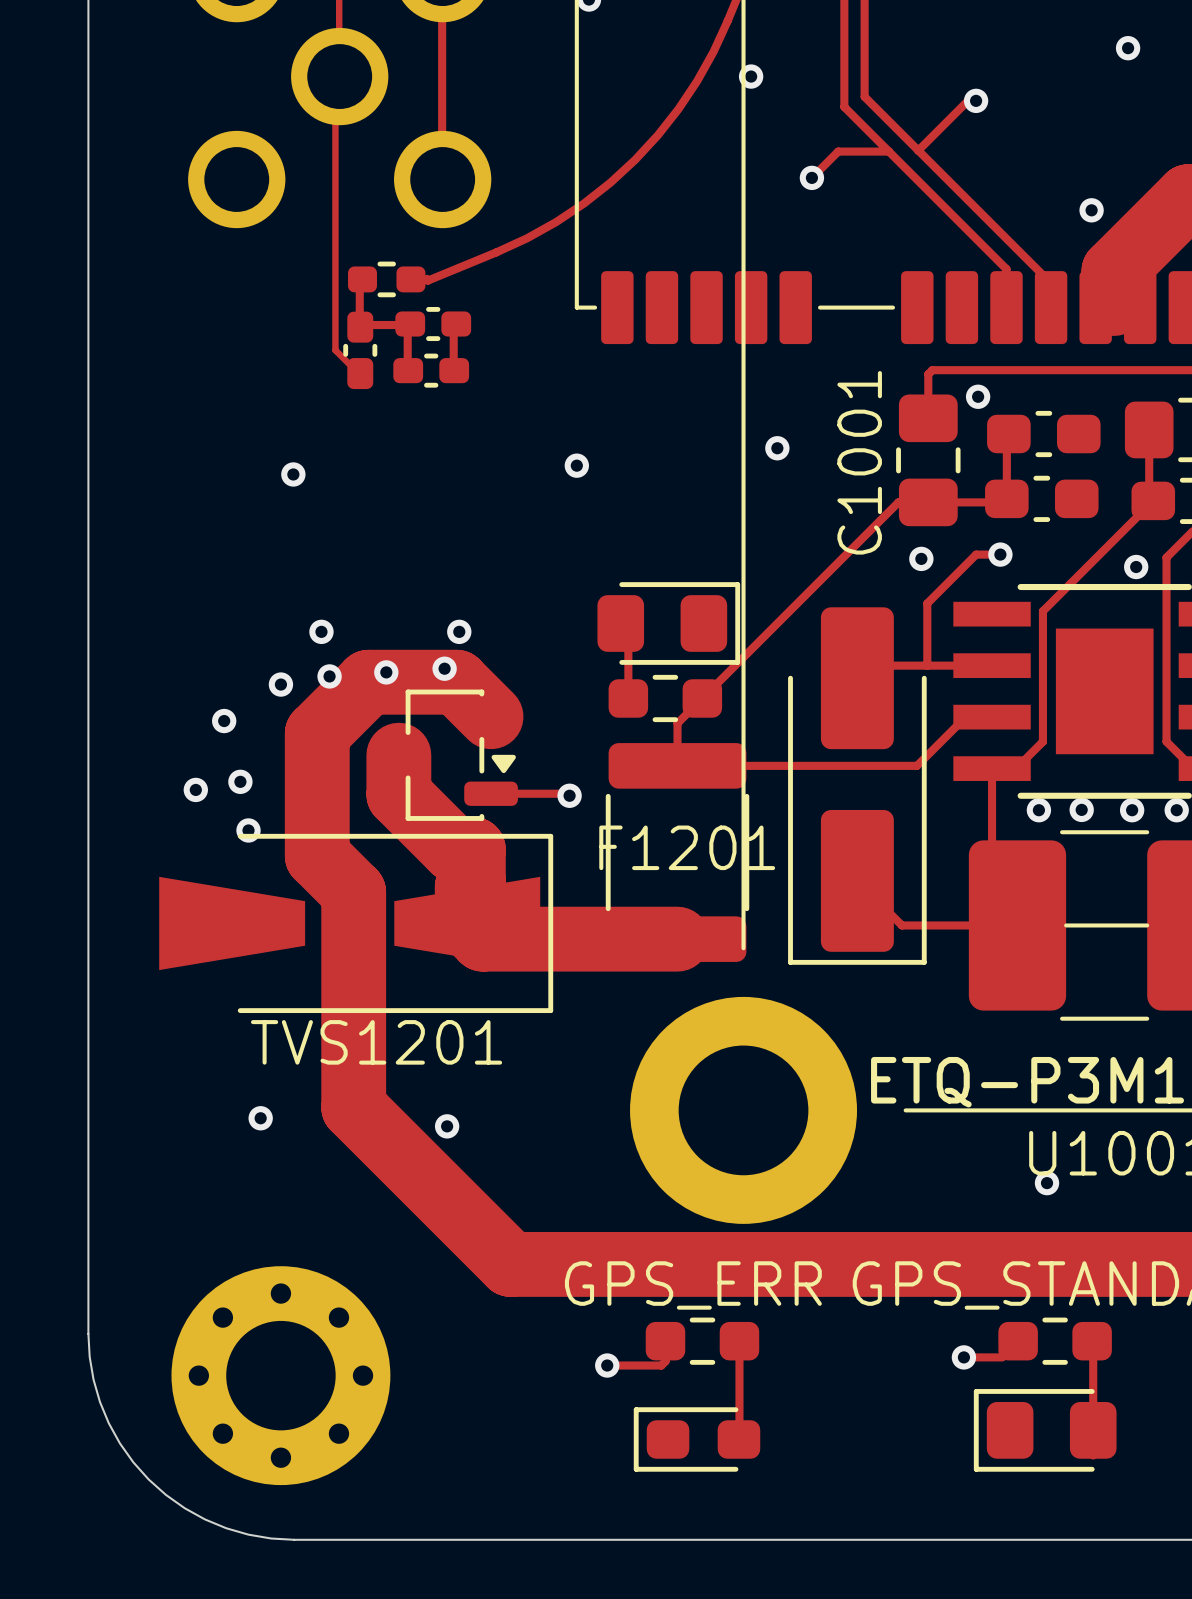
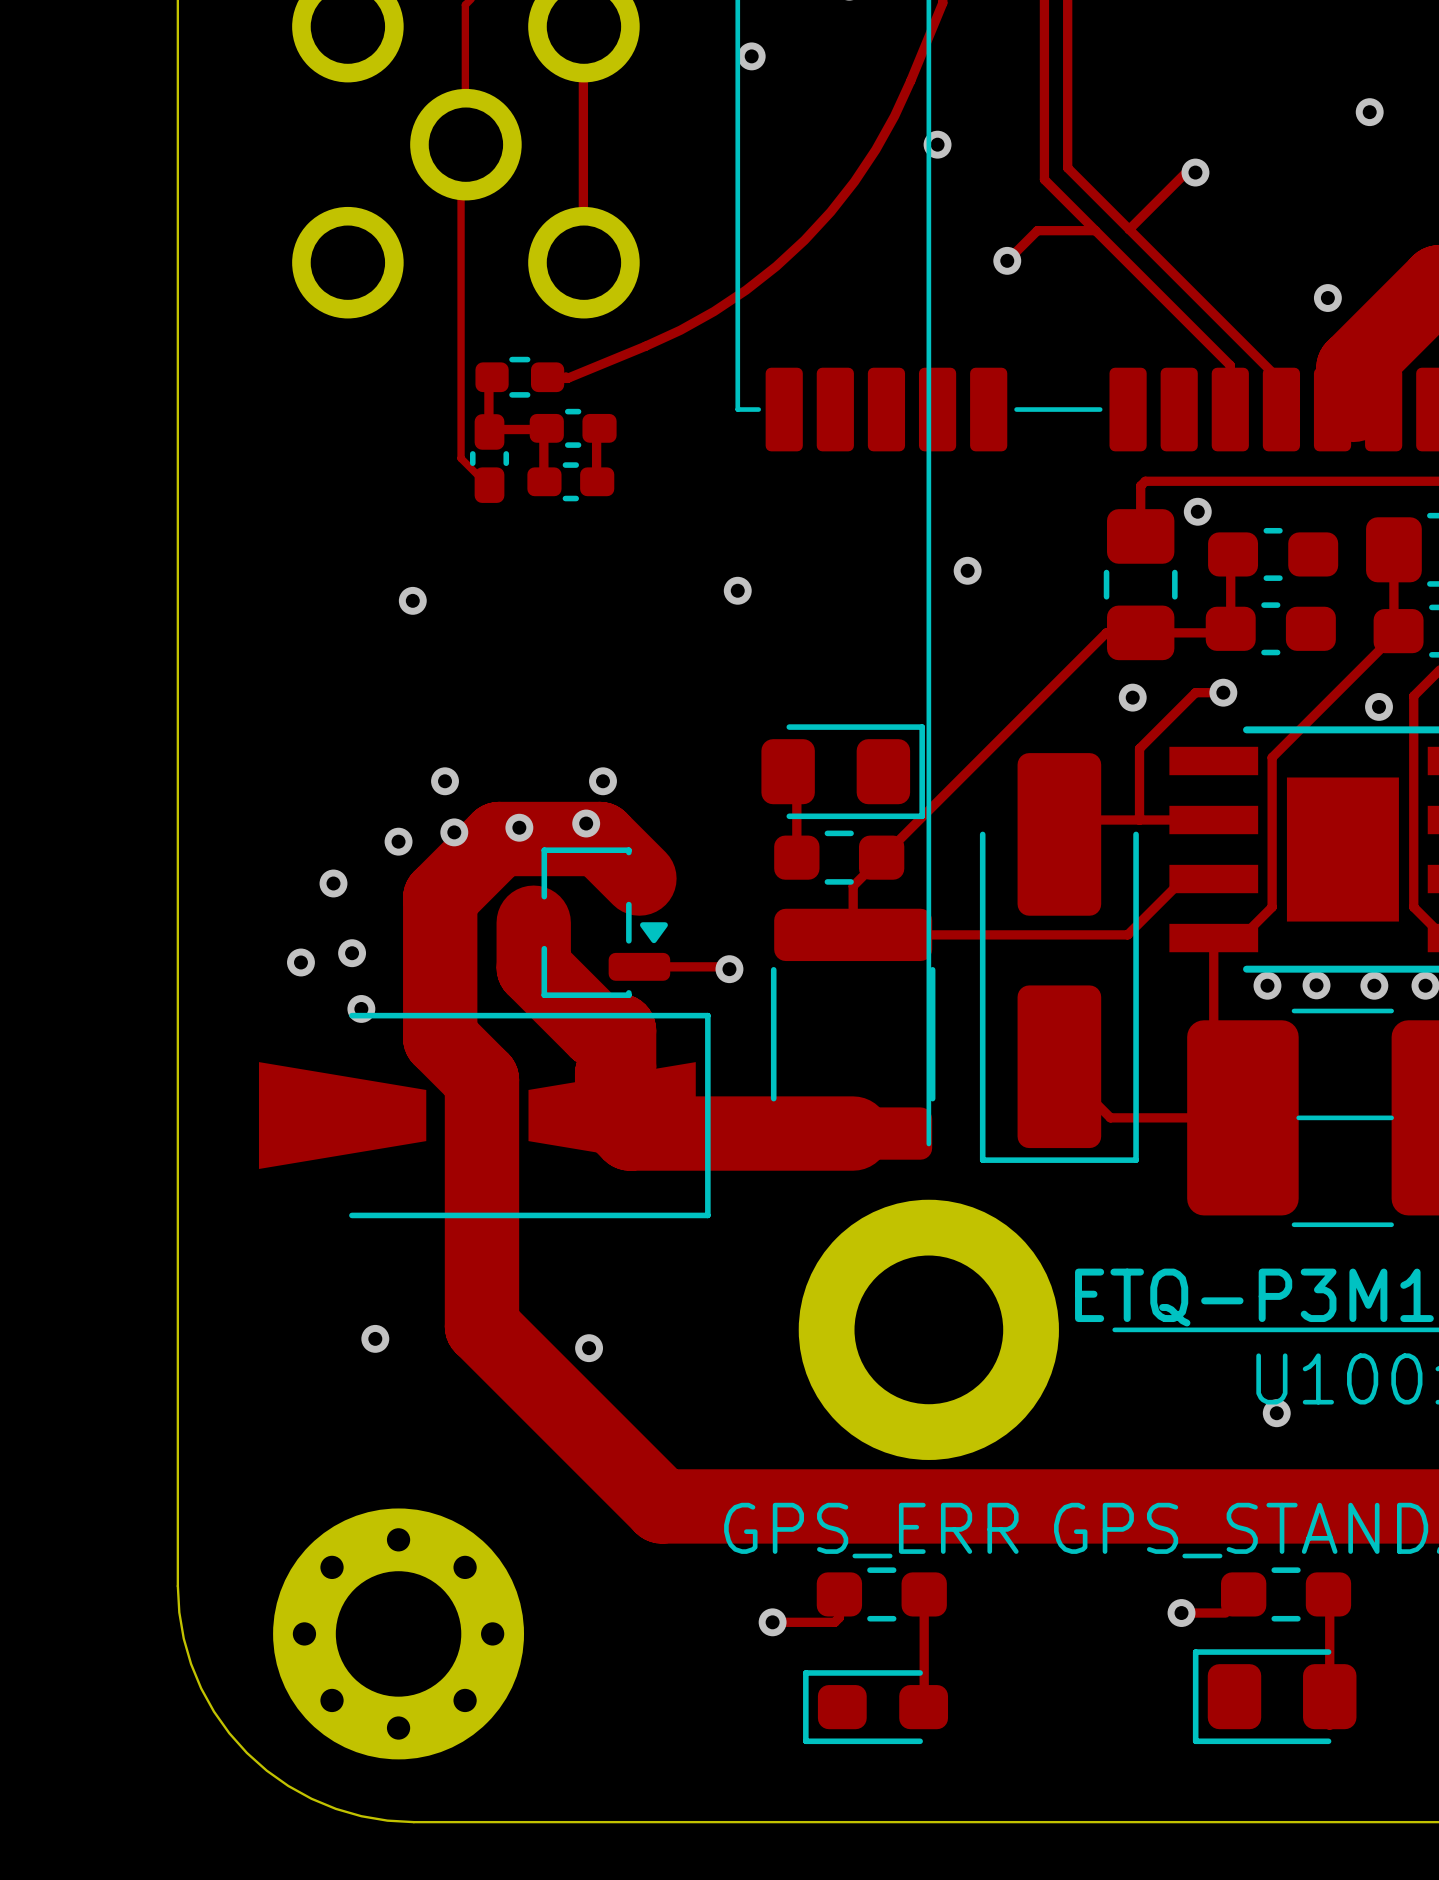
text: C1001 (859, 462) -> none
text: F1201 (687, 847) -> none
text: TVS1201 (376, 1042) -> none

